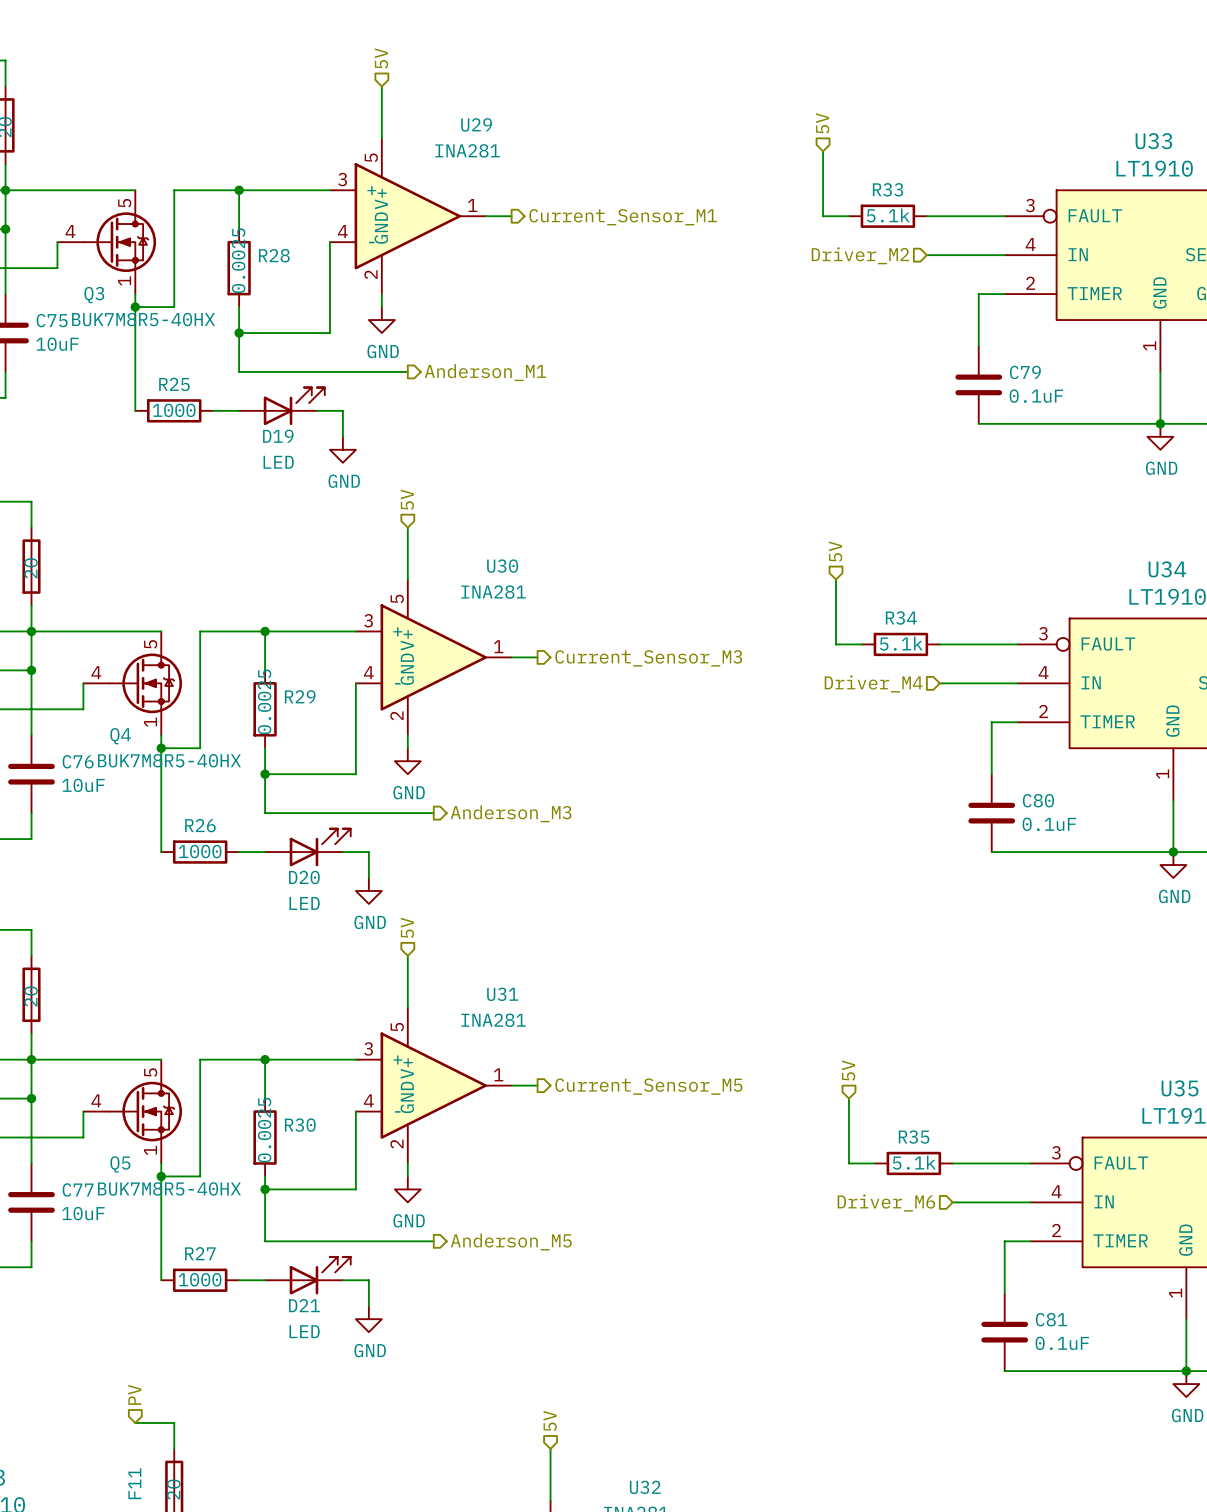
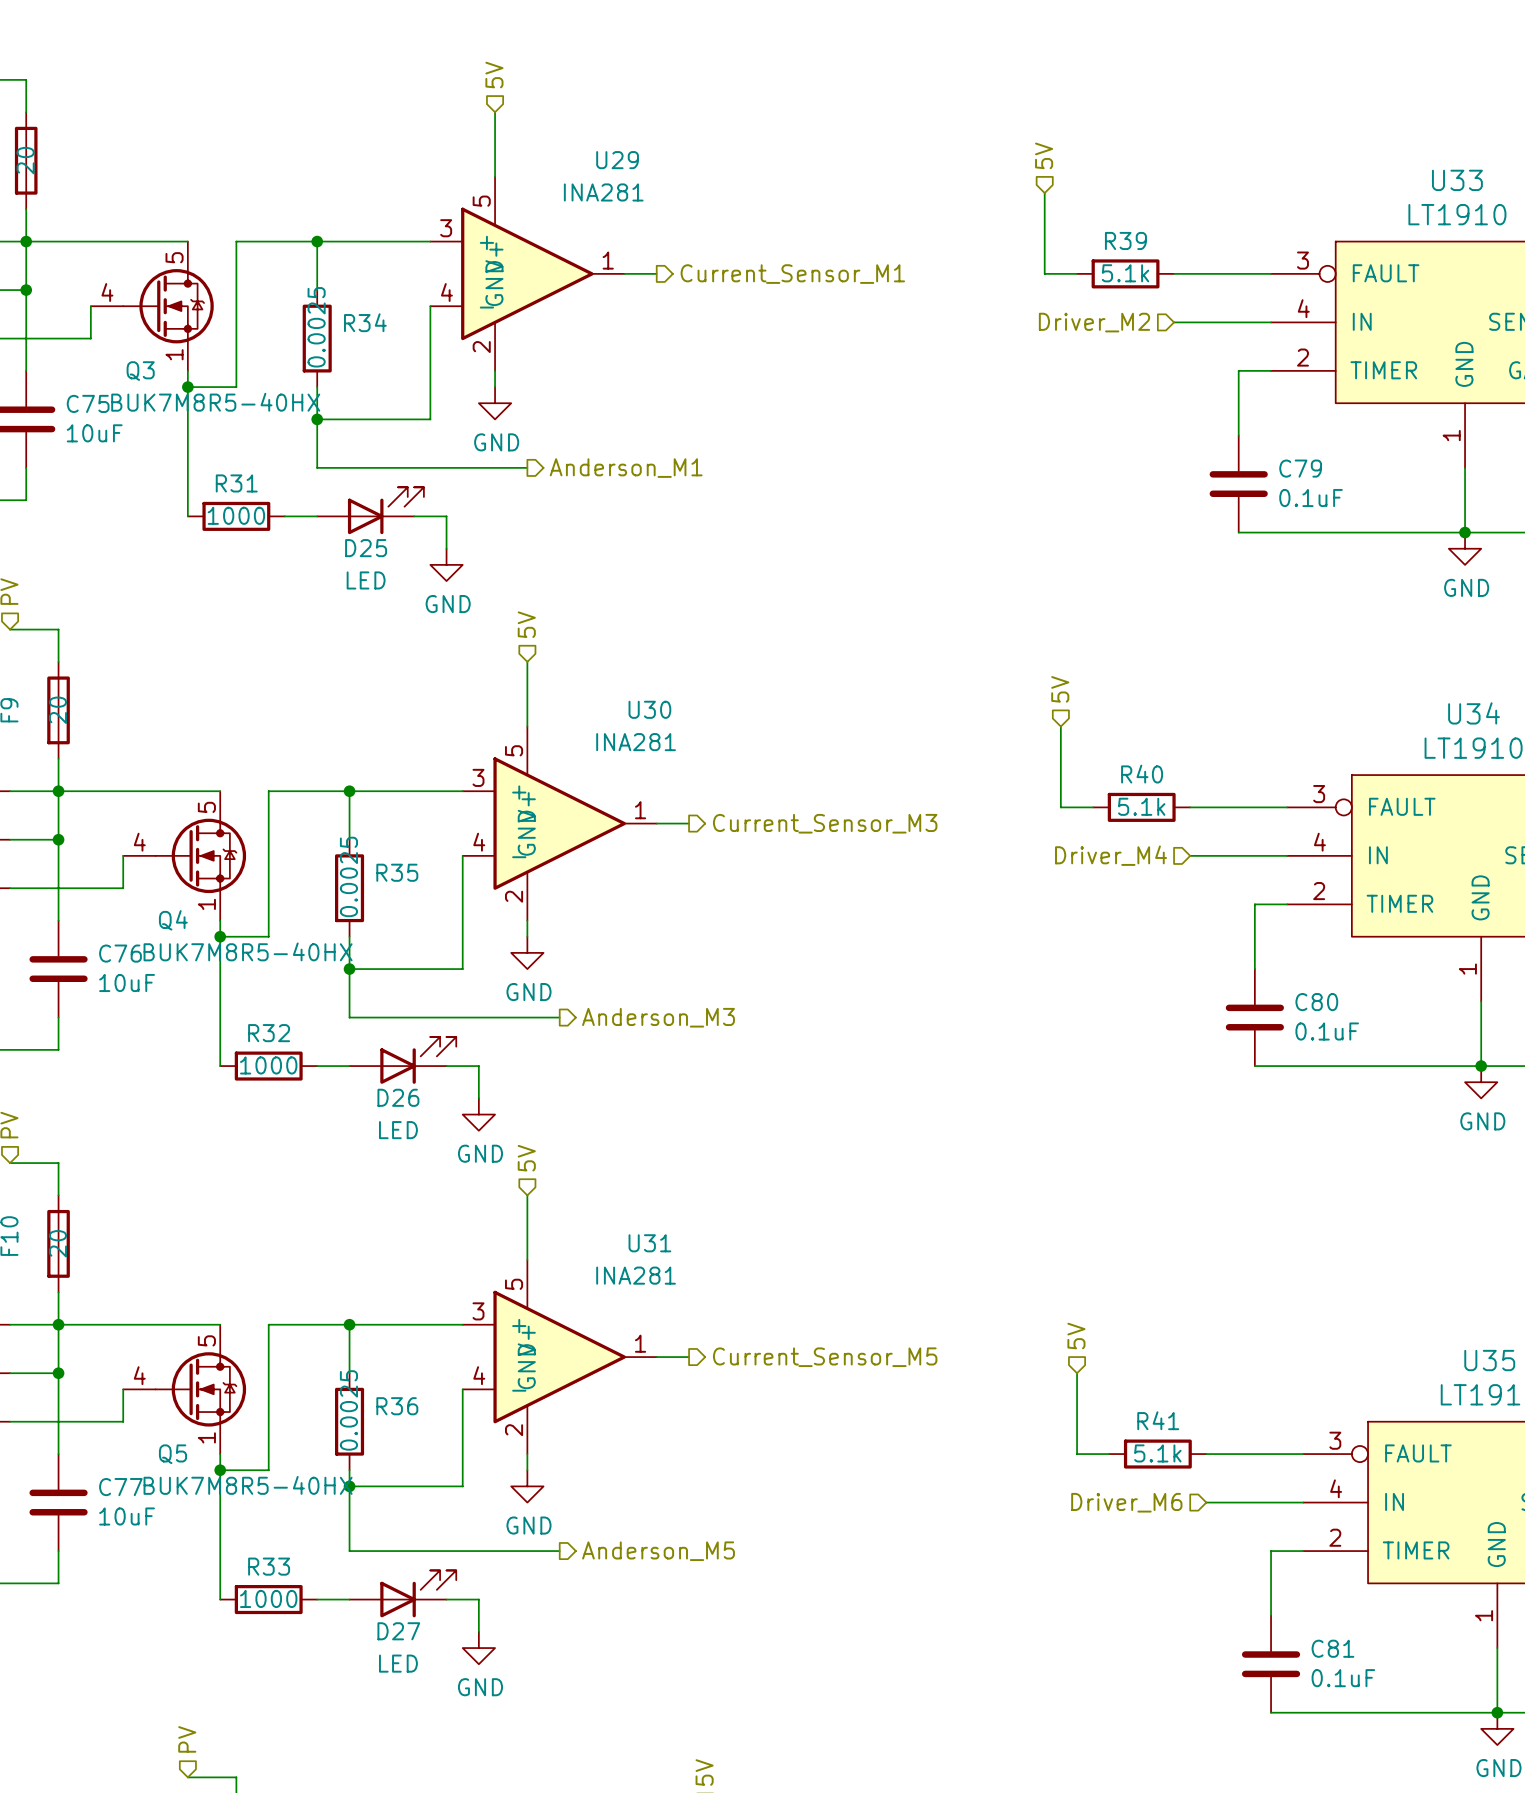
R33 name: R33 (887, 189) -> R39 (1125, 240)
R28 name: R28 (274, 255) -> R34 (365, 322)
R25 name: R25 (174, 384) -> R31 (236, 483)
D19 name: D19 (278, 436) -> D25 (366, 548)
R34 name: R34 (901, 617) -> R40 (1142, 774)
R29 name: R29 (300, 696) -> R35 (397, 872)
R26 name: R26 (200, 825) -> R32 (269, 1033)
D20 name: D20 (304, 877) -> D26 (398, 1097)
R30 name: R30 (300, 1125) -> R36 (397, 1406)
R35 name: R35 (914, 1137) -> R41 (1158, 1420)
R27 name: R27 (200, 1253) -> R33 (269, 1566)
D21 name: D21 (304, 1305) -> D27 (398, 1631)

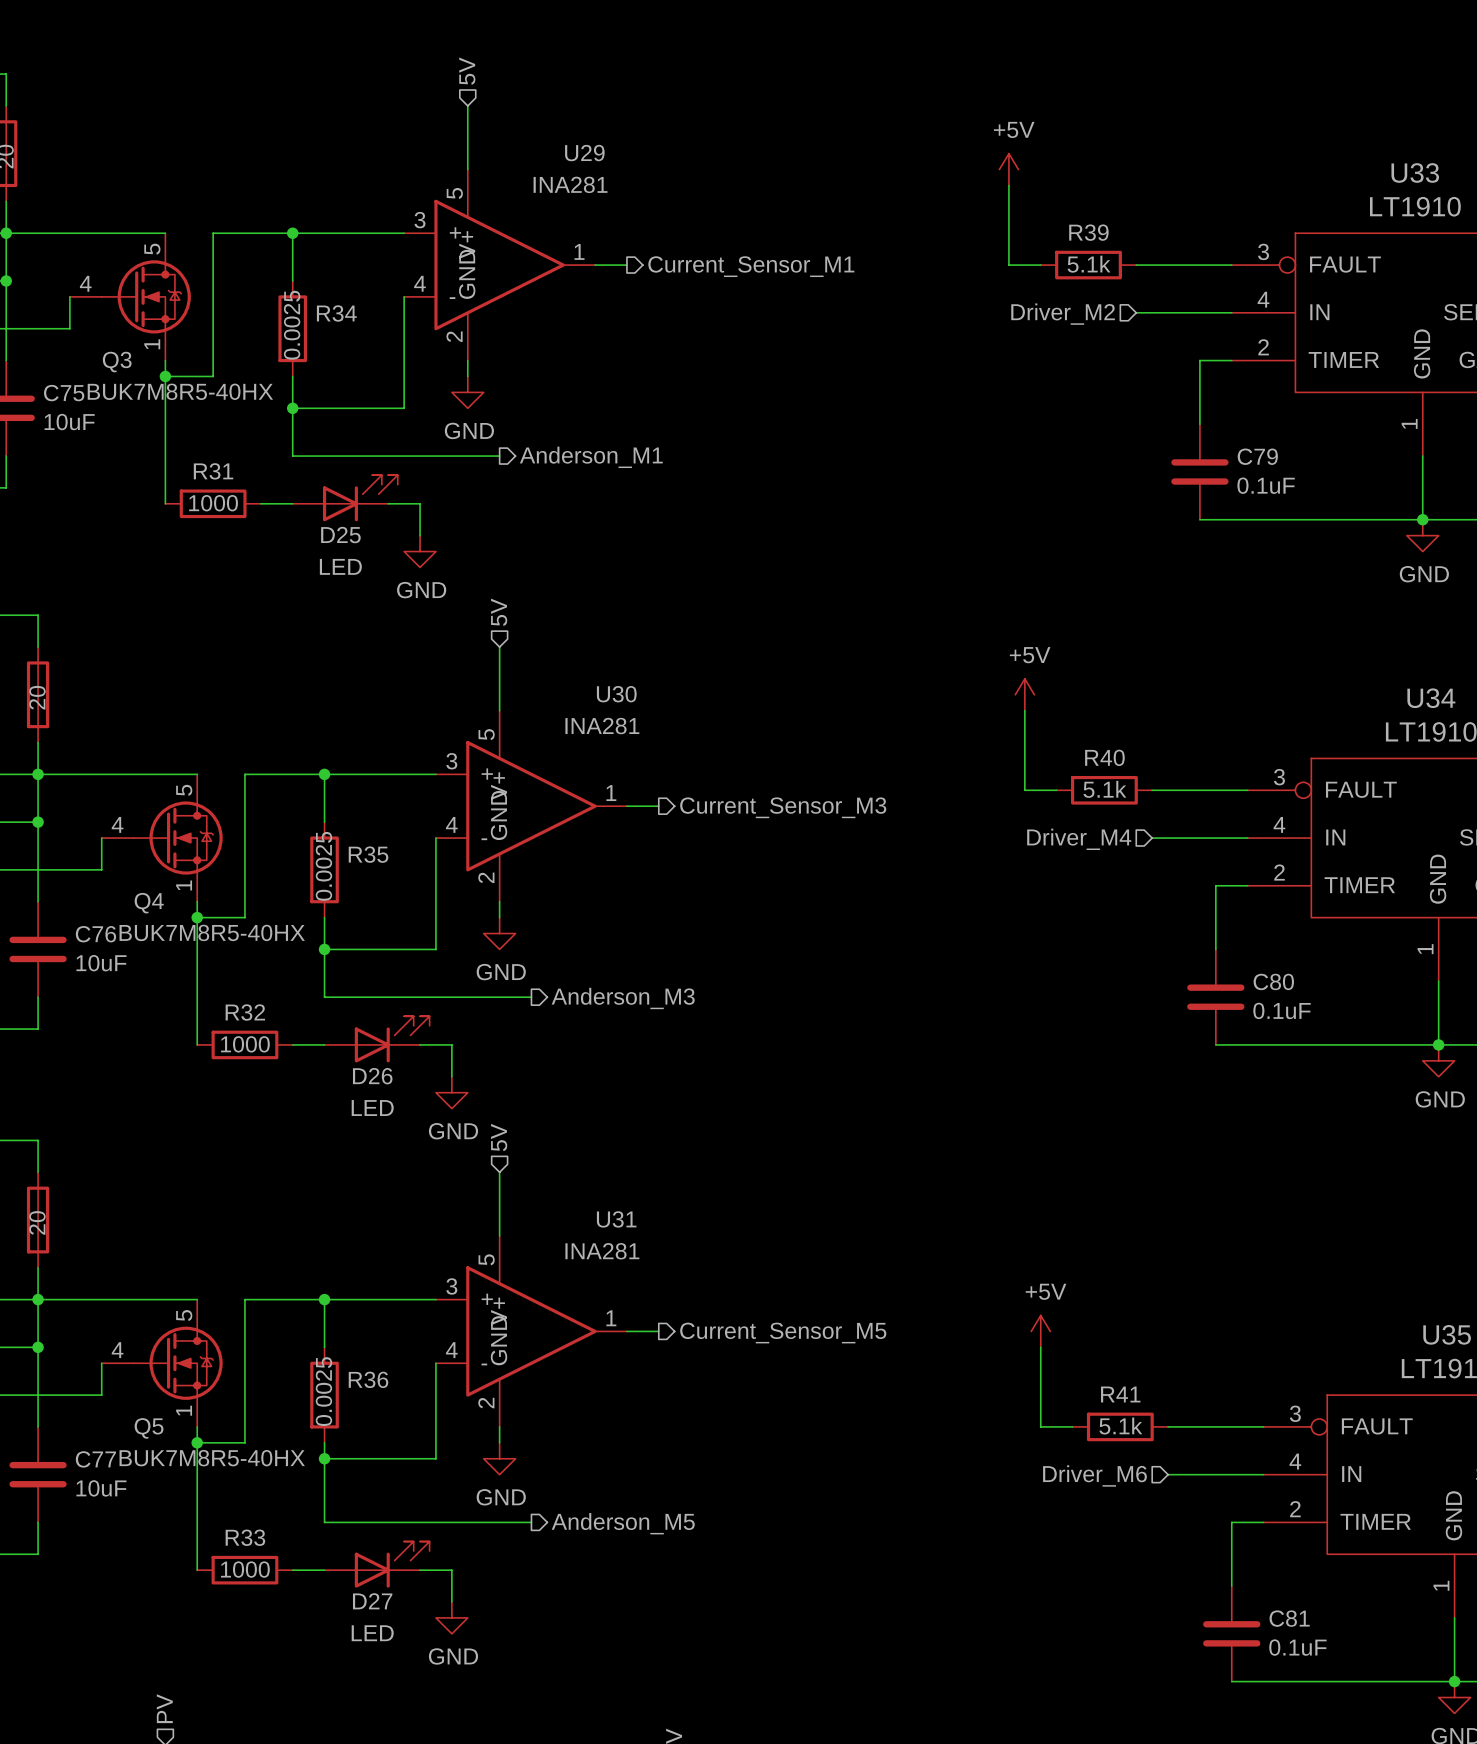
hierarchical label: 5V (1044, 155) -> none
power symbol: none -> +5V (1008, 169)
hierarchical label: 5V (1060, 689) -> none
power symbol: none -> +5V (1024, 694)
hierarchical label: 5V (1076, 1336) -> none
power symbol: none -> +5V (1040, 1331)

